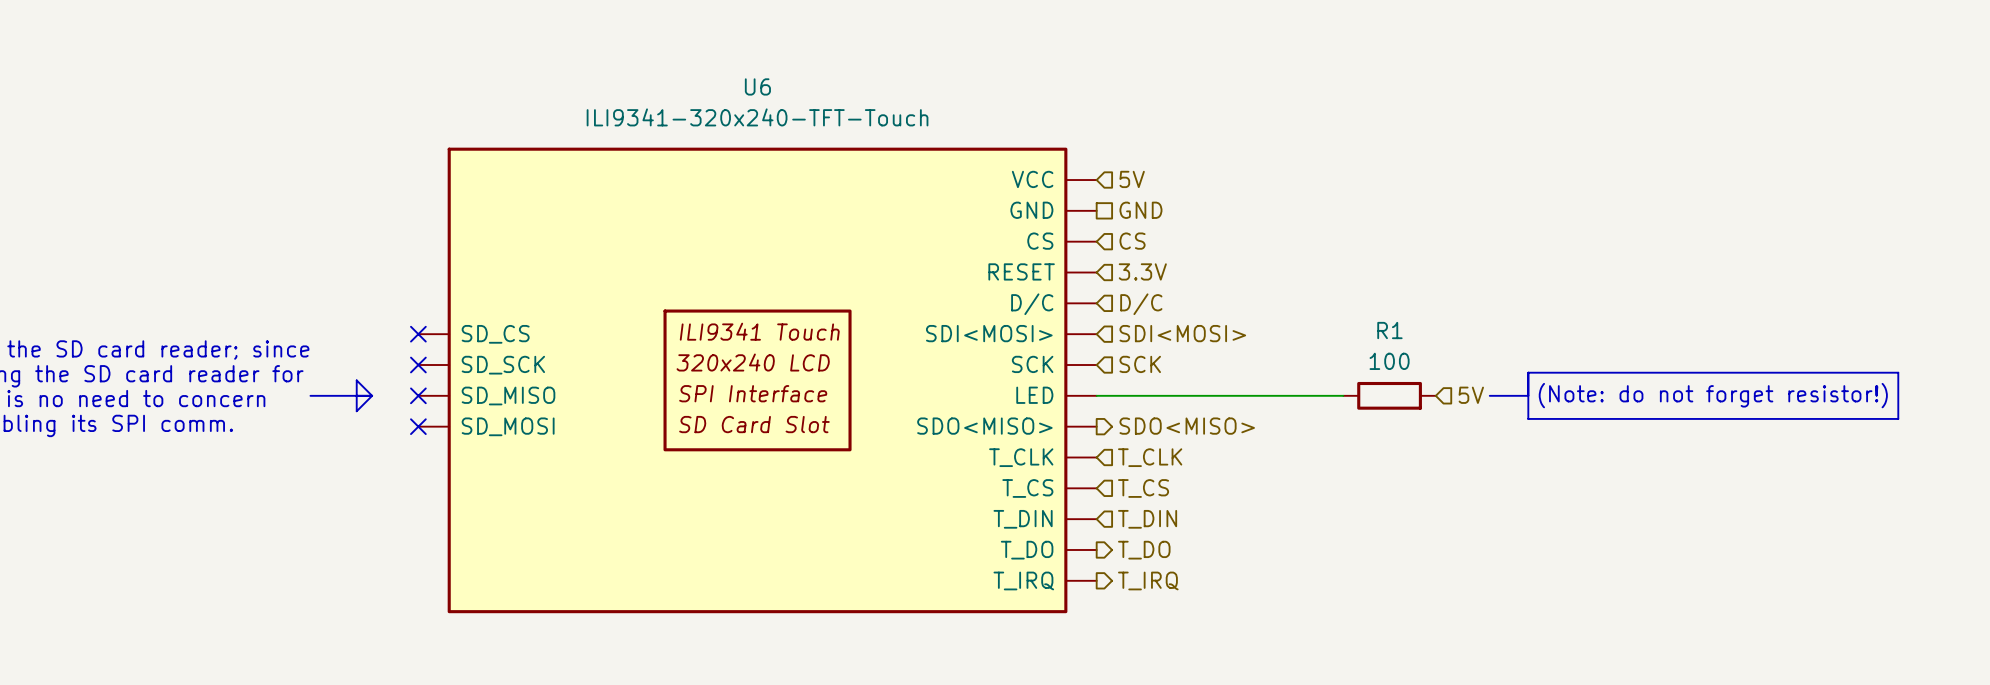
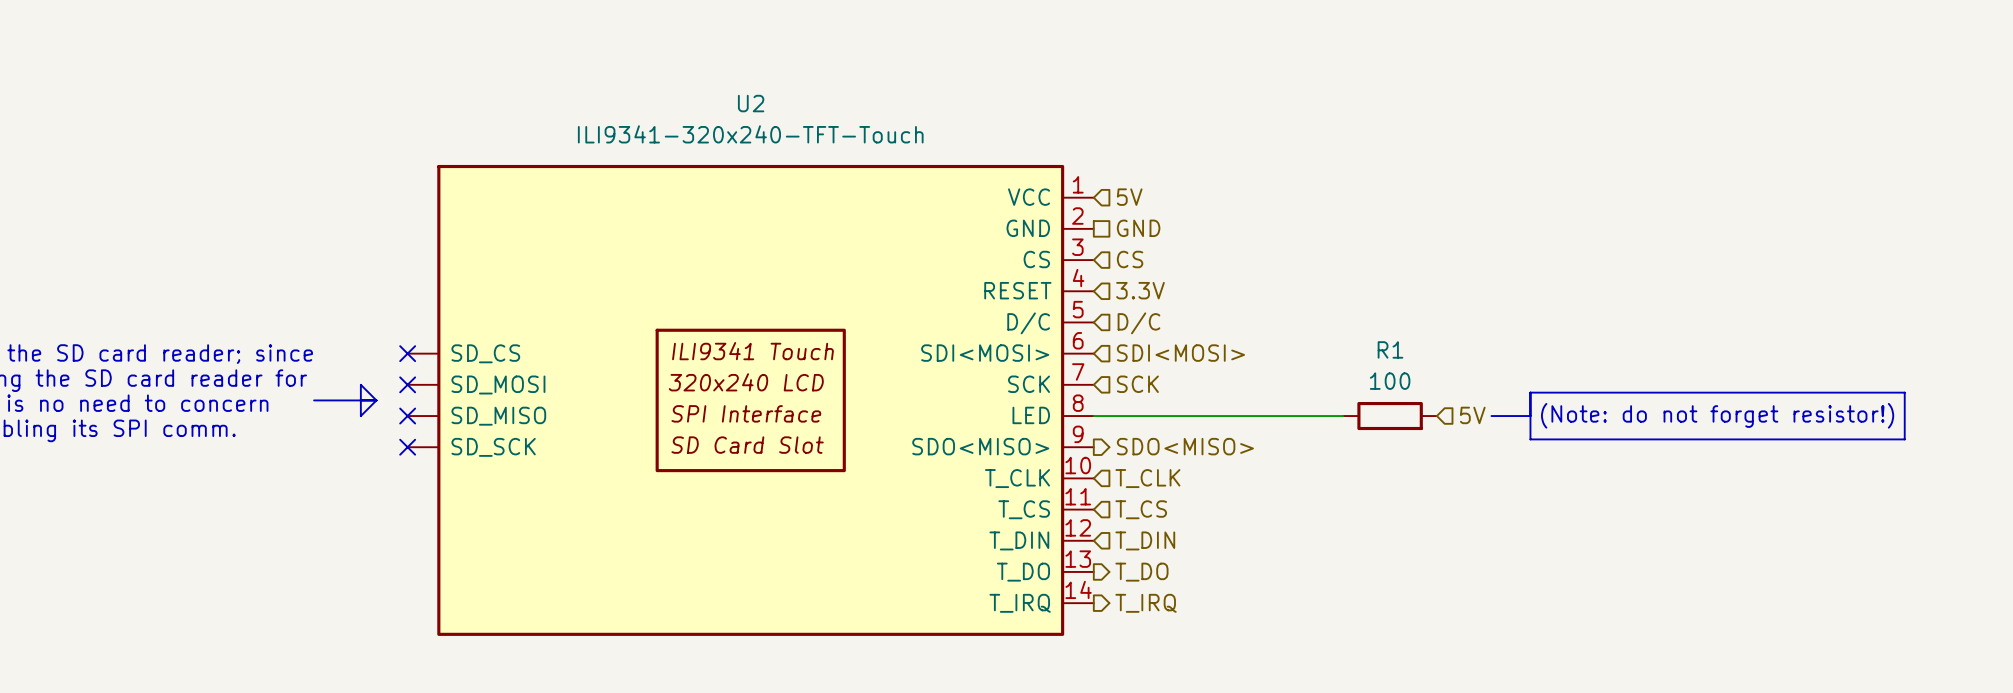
hierarchical label position: 5V (1132, 179) -> 5V (1129, 197)
hierarchical label position: GND (1140, 210) -> GND (1138, 228)
hierarchical label position: CS (1132, 241) -> CS (1130, 259)
hierarchical label position: 3.3V (1142, 271) -> 3.3V (1140, 290)
hierarchical label position: D/C (1141, 304) -> D/C (1138, 323)
hierarchical label position: SDI<MOSI> (1182, 333) -> SDI<MOSI> (1180, 353)
no-connect mark: (418, 334) -> none
no-connect mark: none -> (407, 353)
hierarchical label position: SCK (1140, 364) -> SCK (1137, 384)
no-connect mark: (418, 365) -> none
line: (1528, 372) (1528, 418) (1898, 418) (1898, 372) (1528, 372) -> (1530, 392) (1530, 439) (1904, 439) (1904, 392) (1530, 392)
no-connect mark: none -> (407, 384)
U6: ILI9341-320x240-TFT-Touch (757, 380) -> none
no-connect mark: (418, 395) -> none
U2: none -> ILI9341-320x240-TFT-Touch (750, 400)
wire: (1096, 395) (1343, 395) -> (1093, 416) (1343, 416)
R1 position: (1389, 395) -> (1390, 416)
hierarchical label position: 5V (1471, 395) -> 5V (1472, 415)
line: (1489, 395) (1528, 395) -> (1491, 416) (1530, 416)
text position: (Note: do not forget resistor!) (1713, 395) -> (Note: do not forget resistor!) (1717, 415)
no-connect mark: none -> (407, 416)
no-connect mark: (418, 426) -> none
hierarchical label position: SDO<MISO> (1187, 426) -> SDO<MISO> (1185, 446)
no-connect mark: none -> (407, 447)
hierarchical label position: T_CLK (1150, 457) -> T_CLK (1147, 478)
hierarchical label position: T_CS (1143, 488) -> T_CS (1141, 509)
hierarchical label position: T_DIN (1147, 519) -> T_DIN (1145, 540)
hierarchical label position: T_DO (1144, 550) -> T_DO (1141, 572)
hierarchical label position: T_IRQ (1148, 580) -> T_IRQ (1146, 603)

